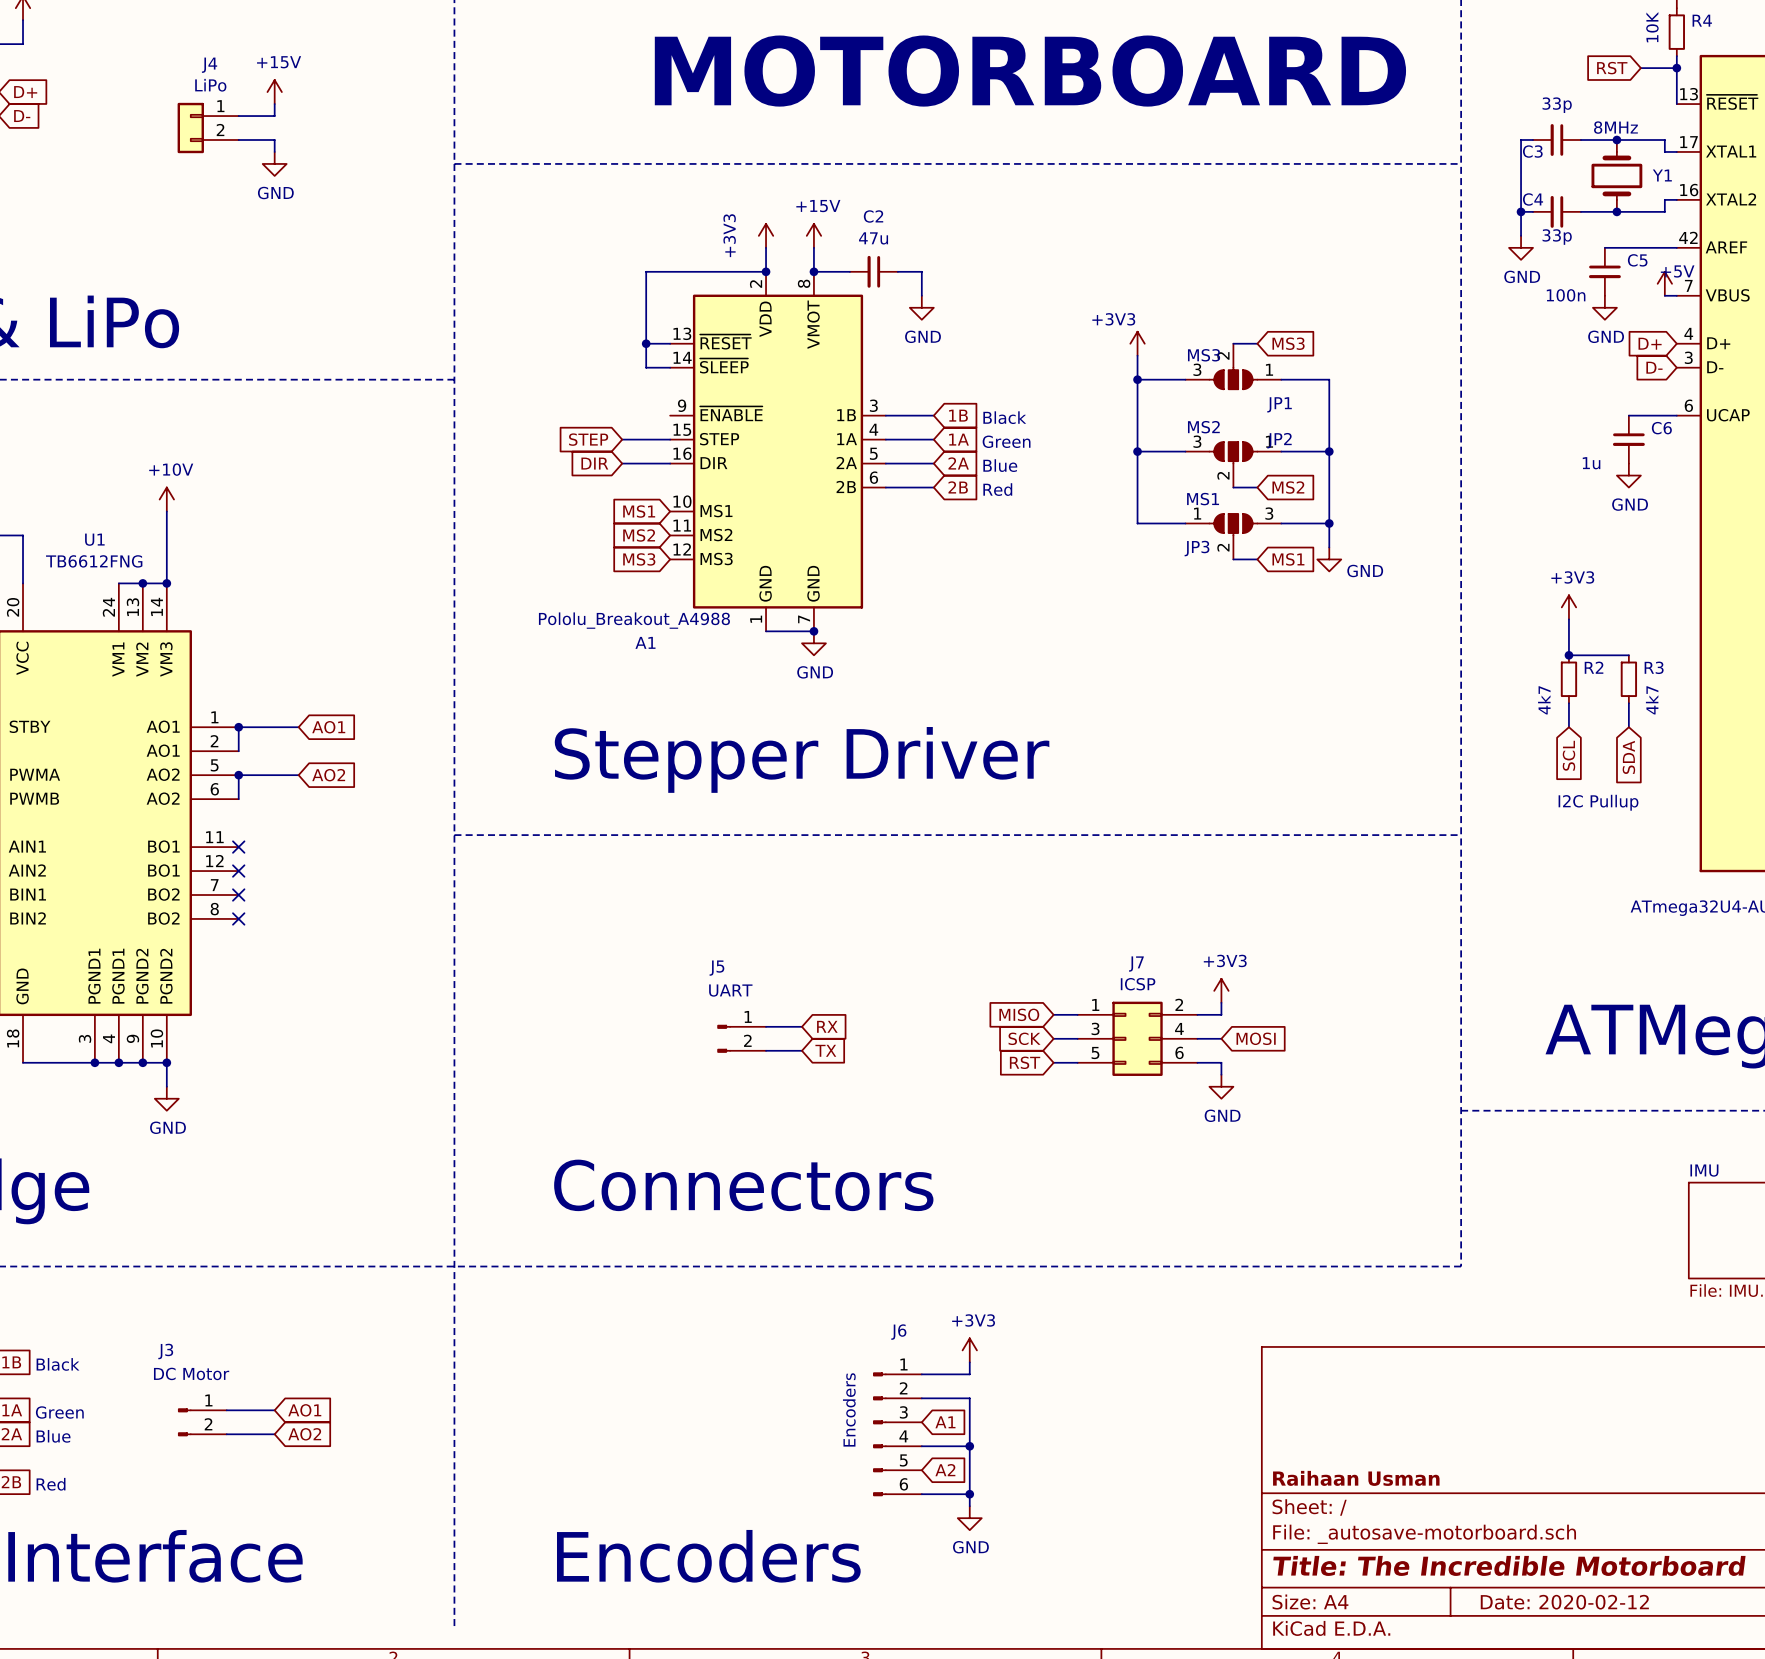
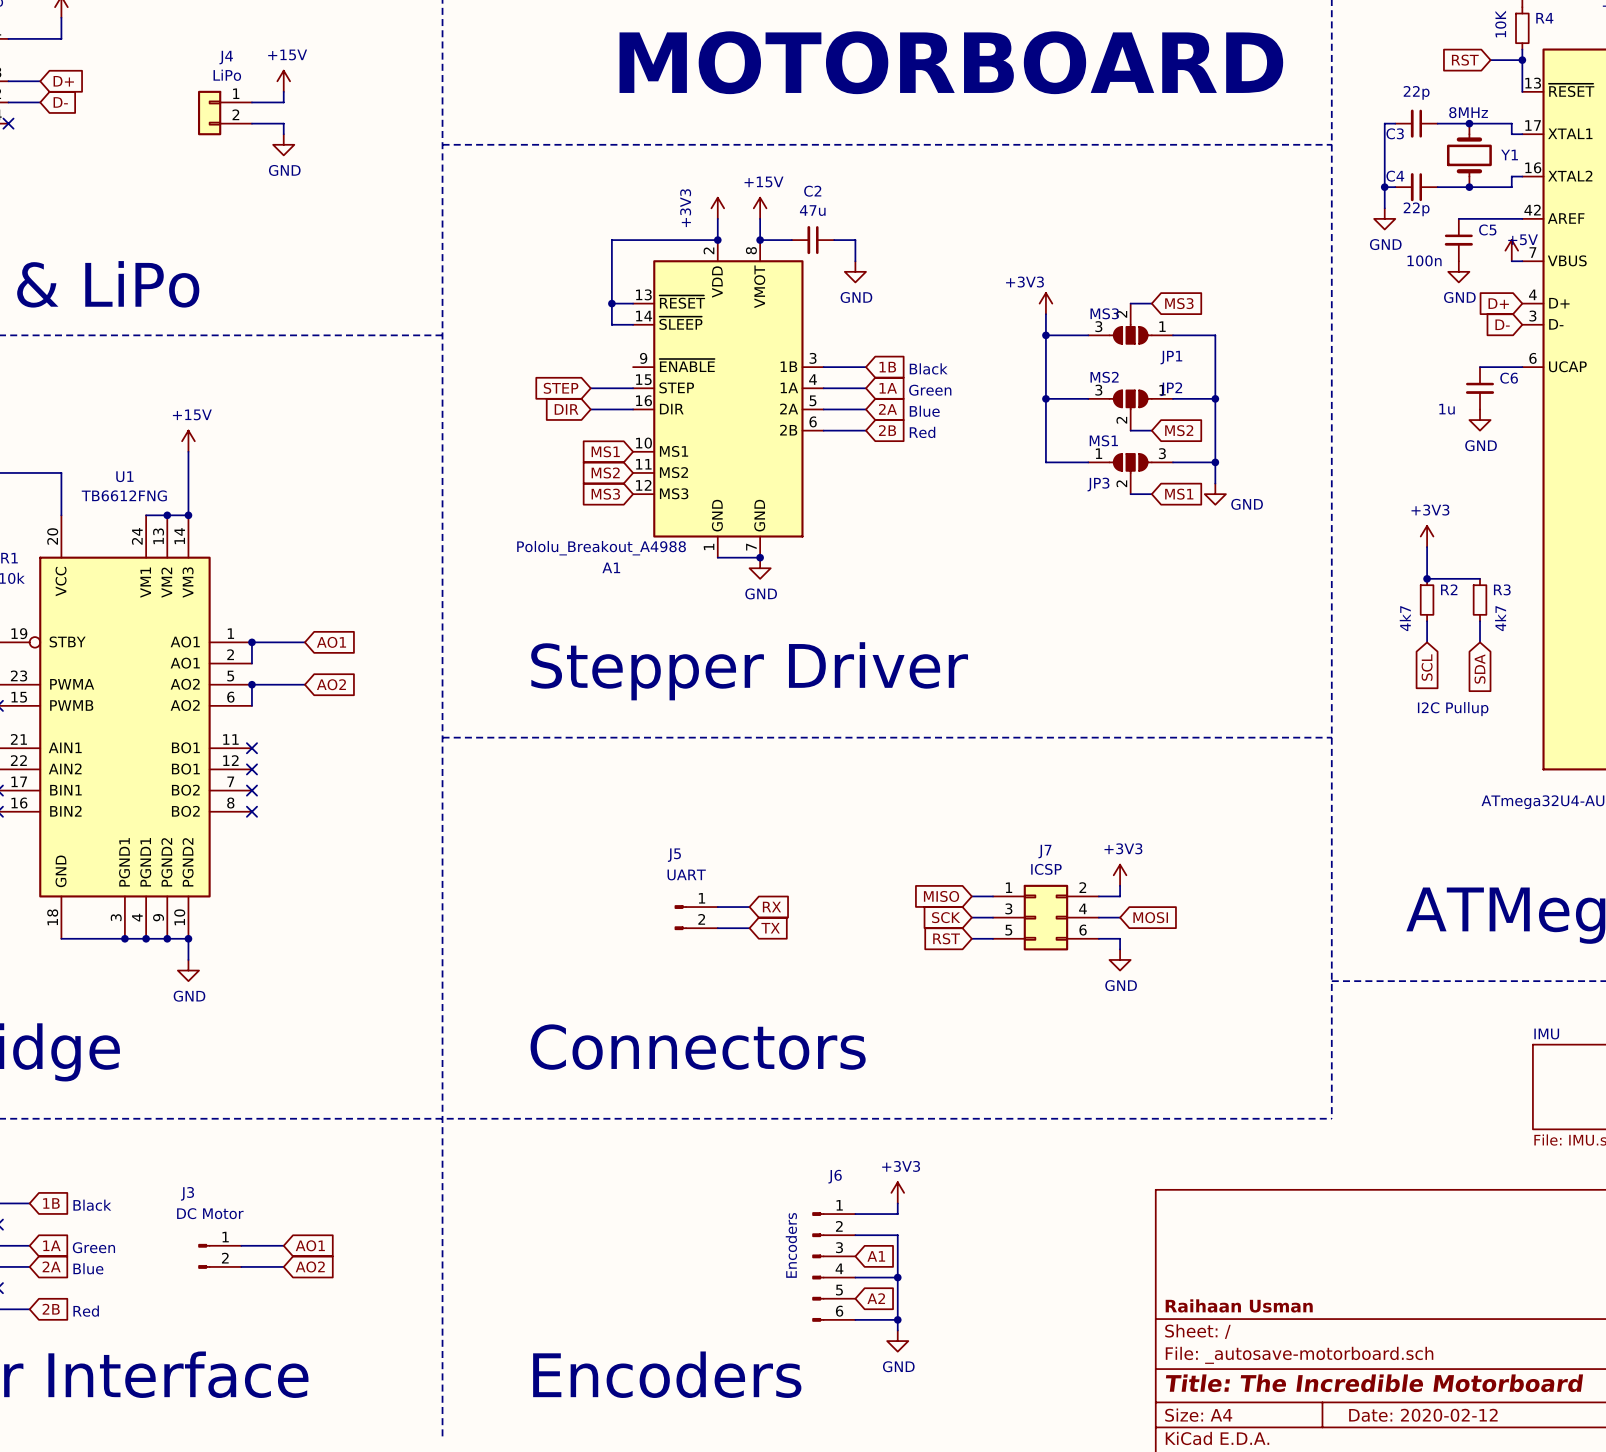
C3 value: 33p (1557, 105) -> 22p (1416, 92)
C4 value: 33p (1557, 237) -> 22p (1416, 209)
power symbol: +10V (166, 499) -> +15V (188, 441)

